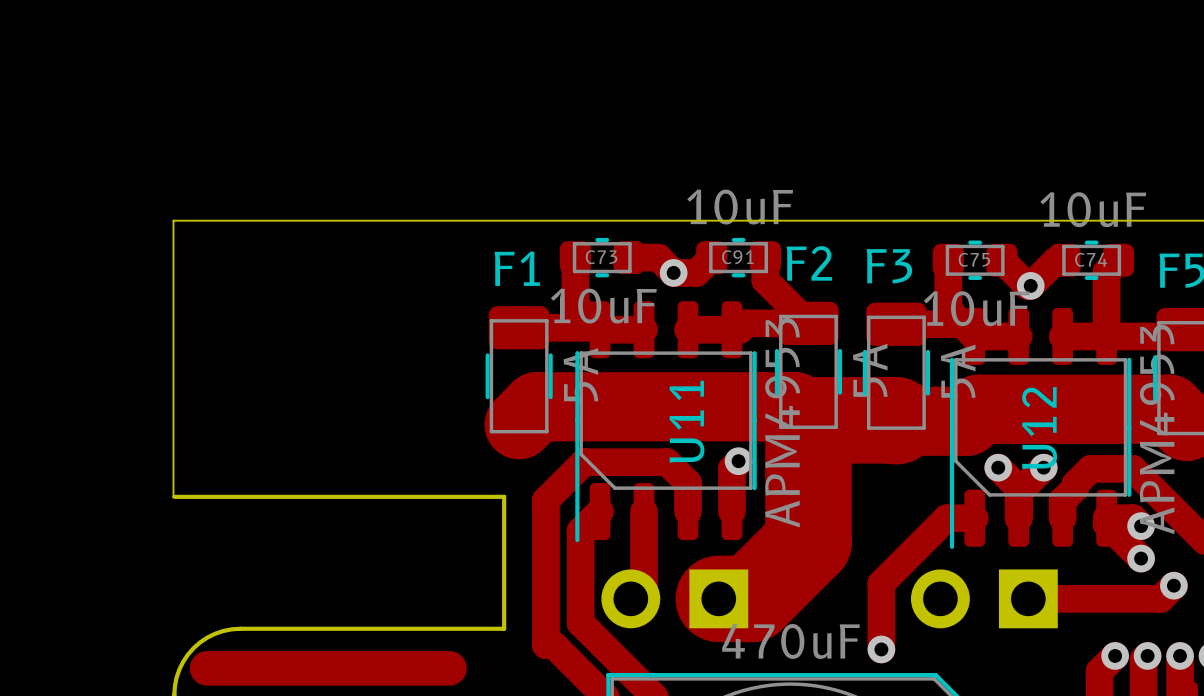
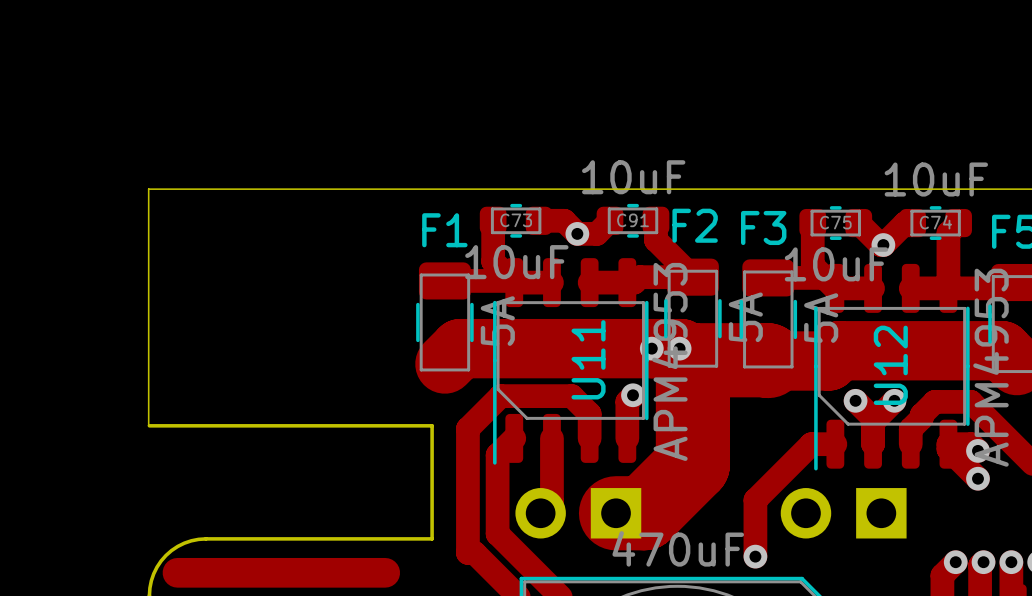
via: none -> (651, 348)
via: none -> (679, 348)
track: (1173, 585) (1160, 598) (1028, 598) -> none
via: (1173, 585) -> none

